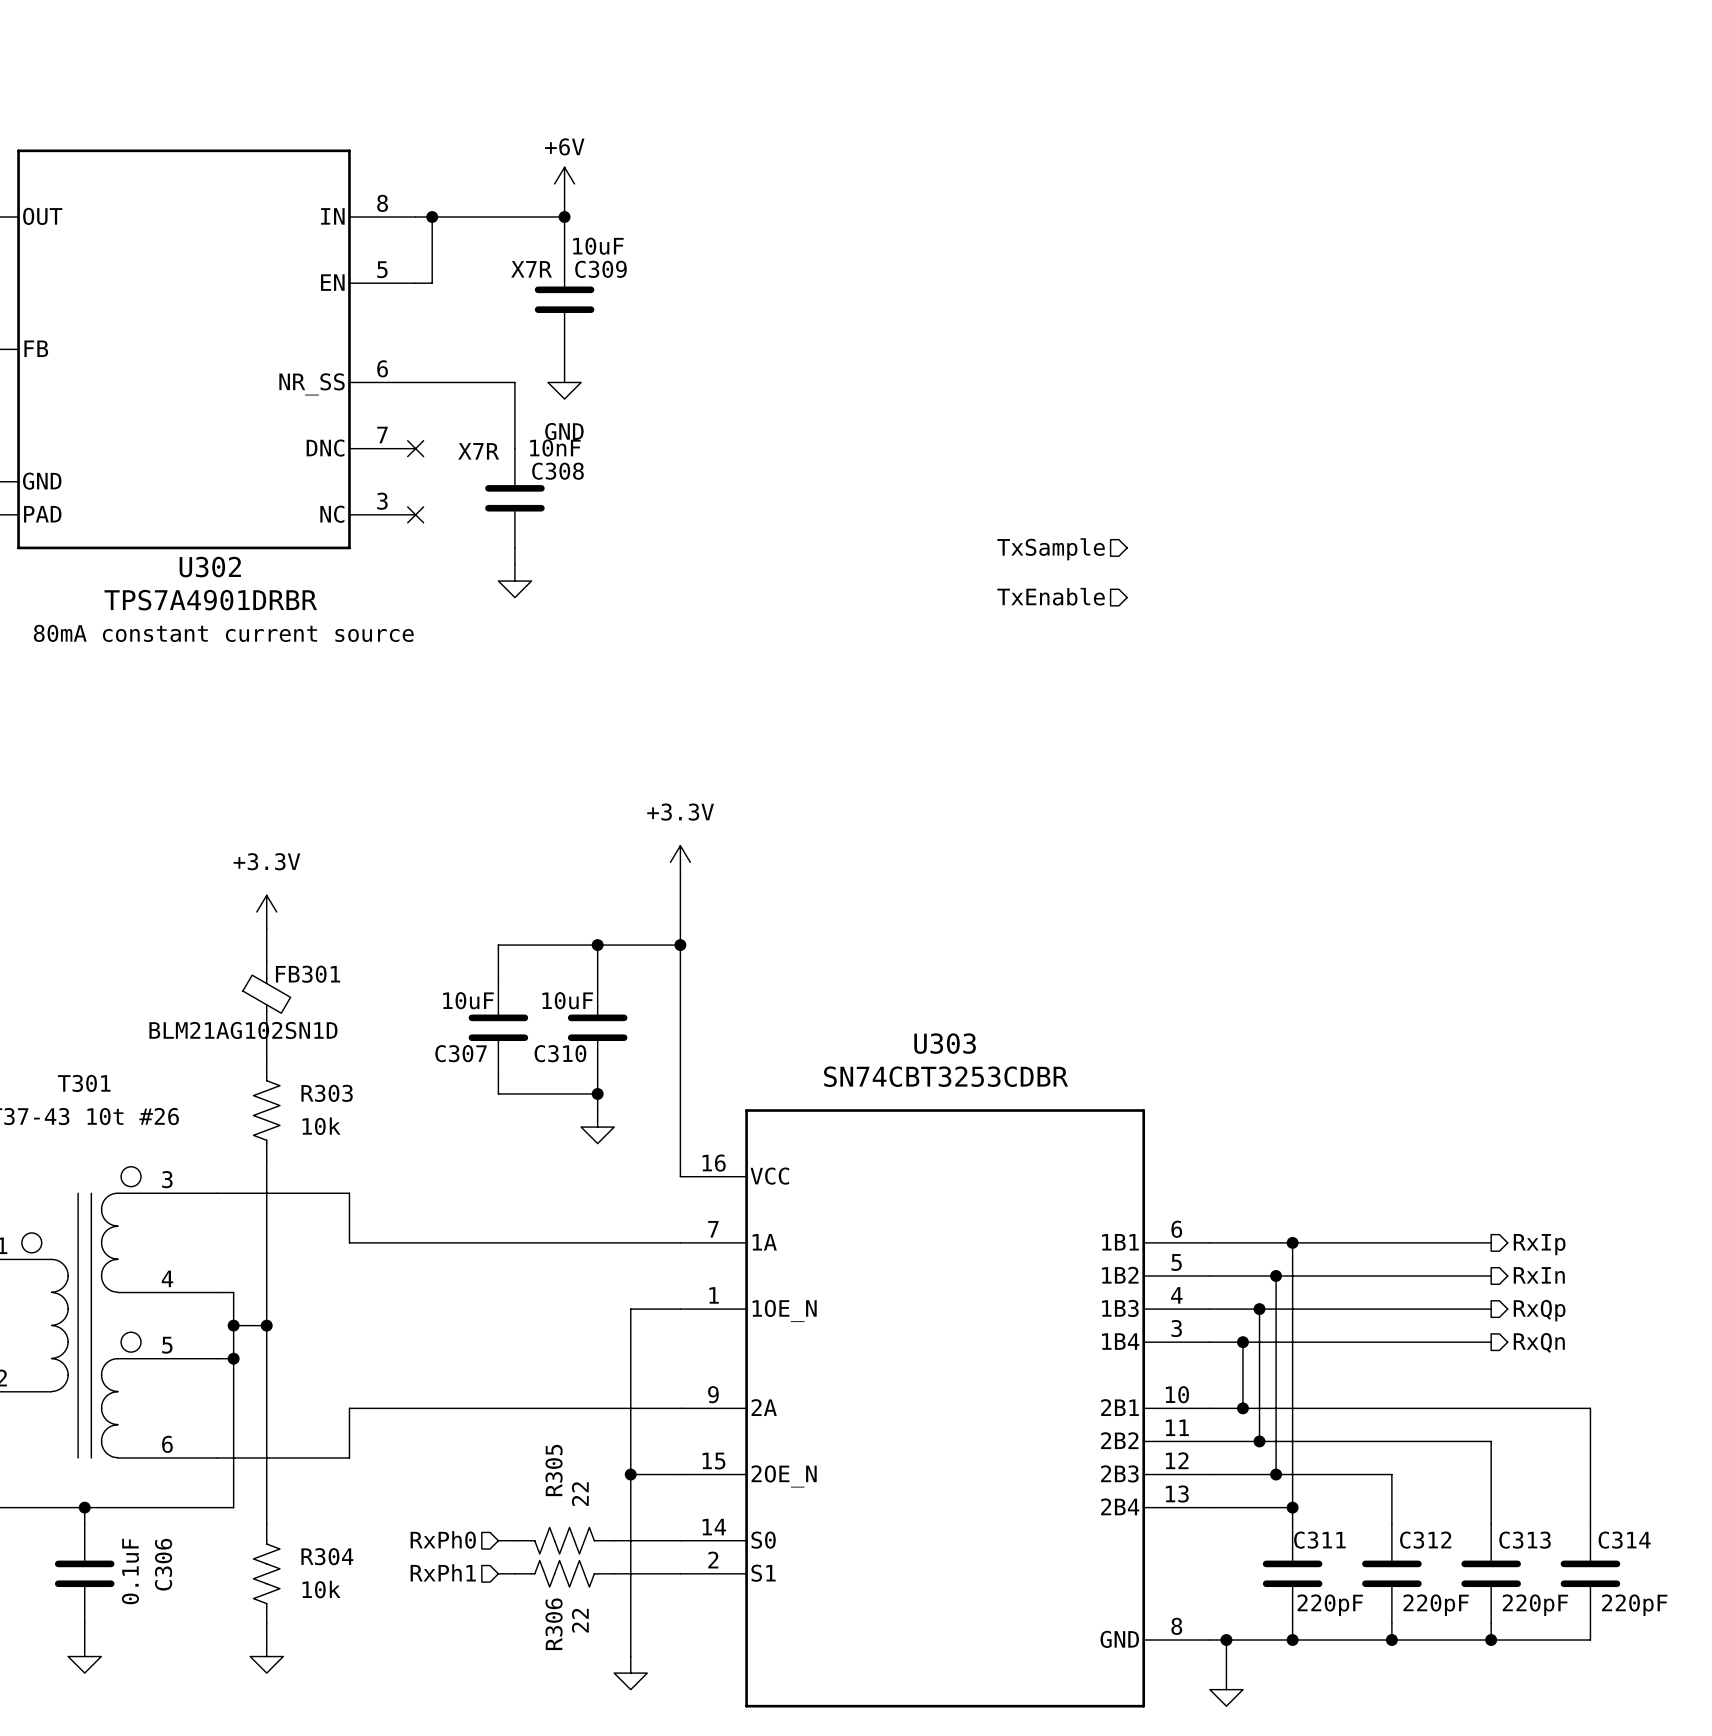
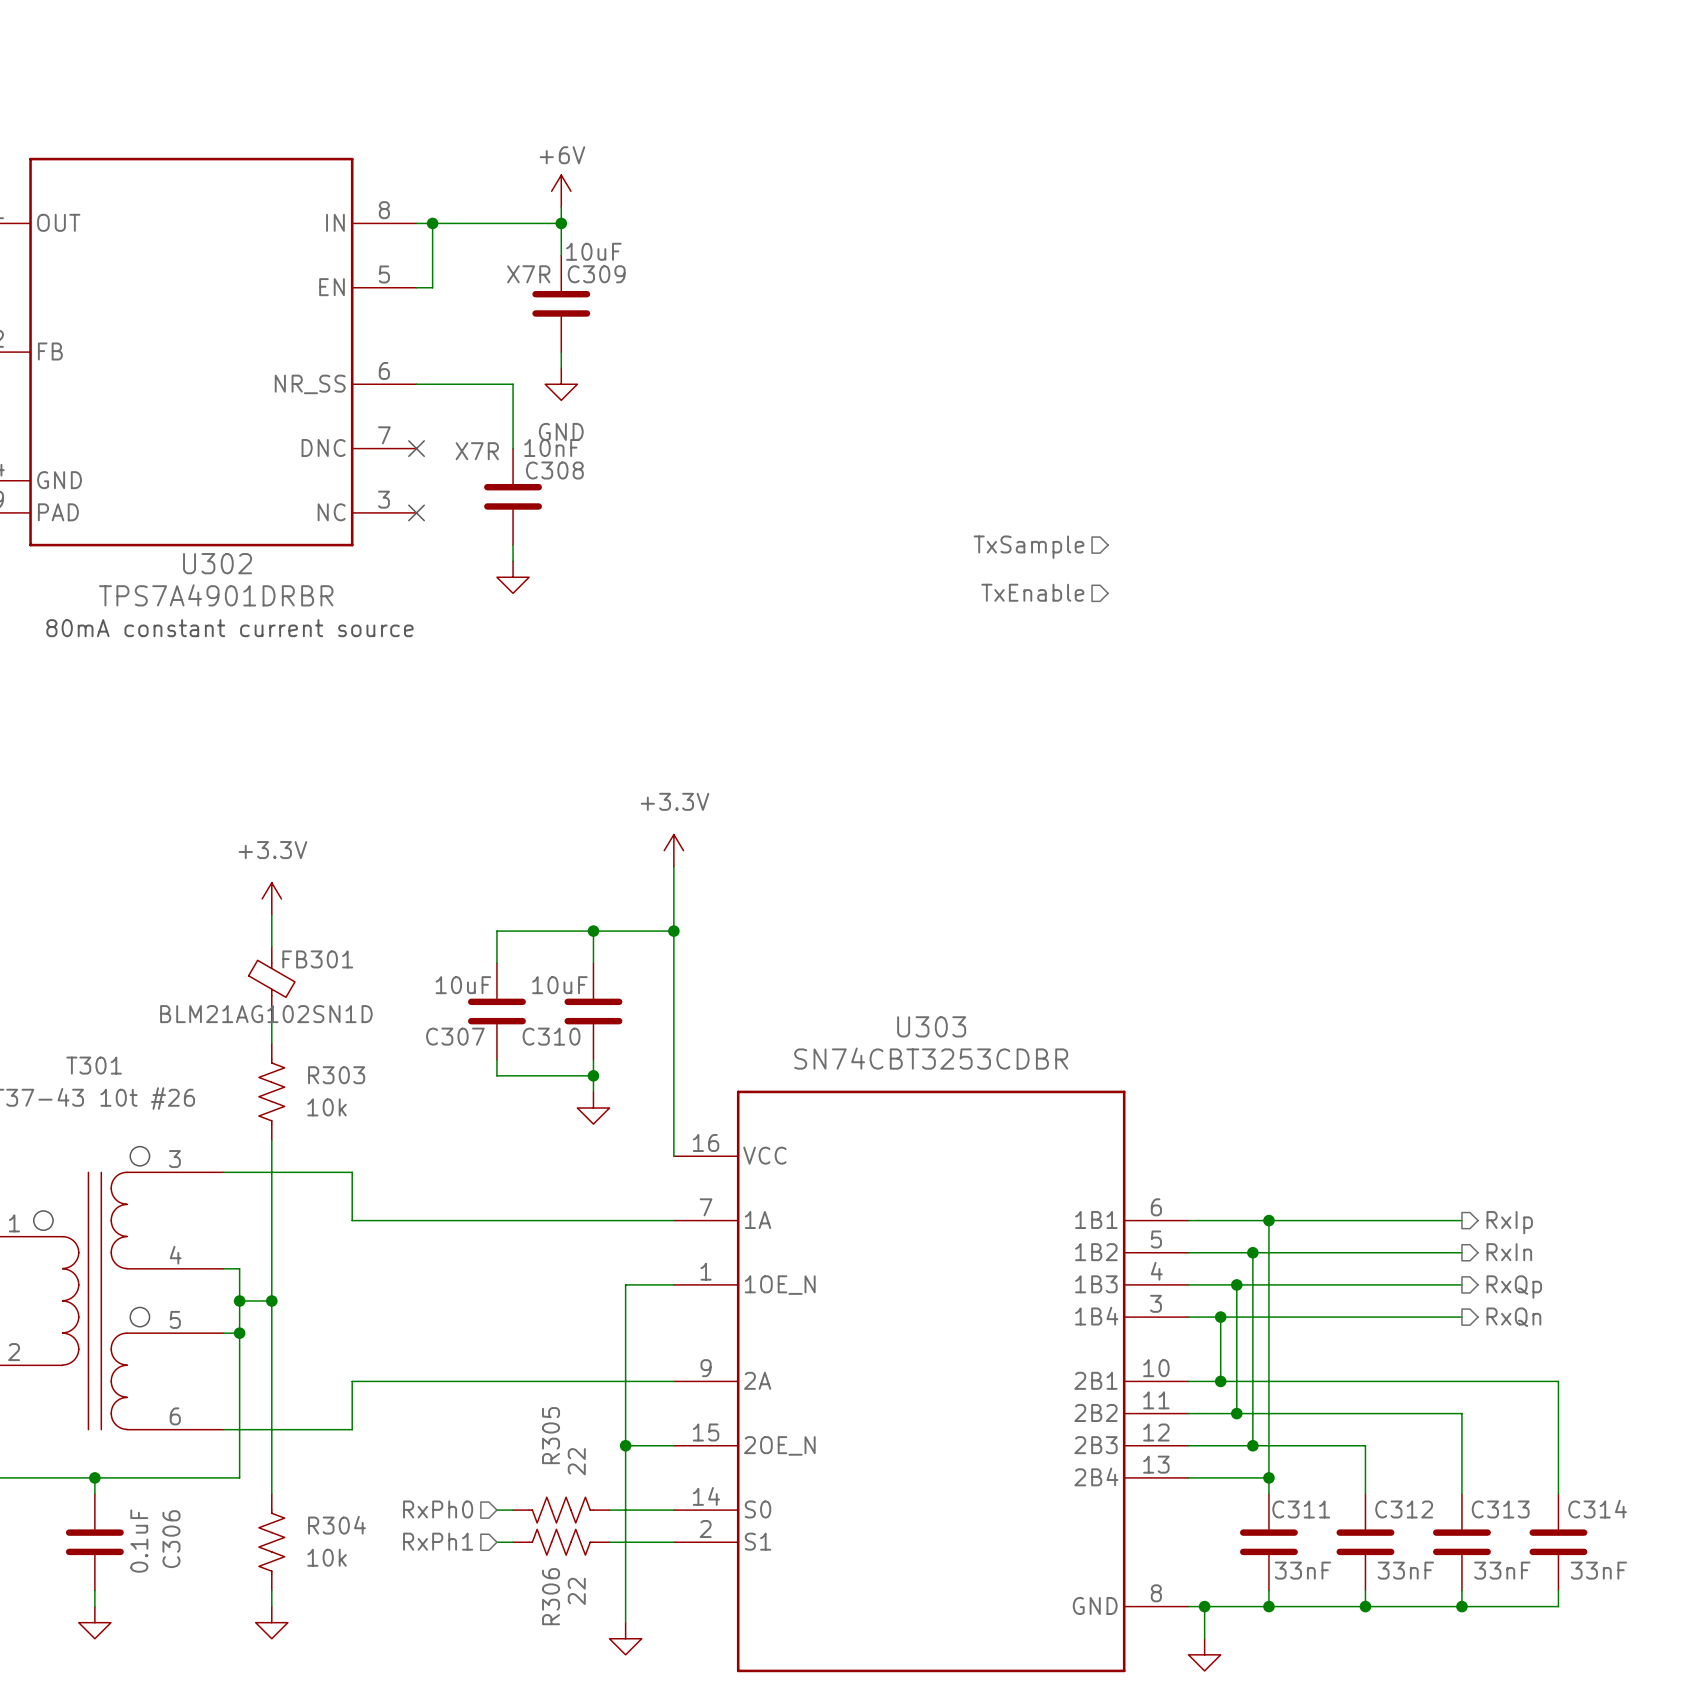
C311 value: 220pF (1330, 1605) -> 33nF (1302, 1570)
C312 value: 220pF (1436, 1605) -> 33nF (1405, 1570)
C313 value: 220pF (1535, 1605) -> 33nF (1502, 1570)
C314 value: 220pF (1634, 1605) -> 33nF (1598, 1570)

